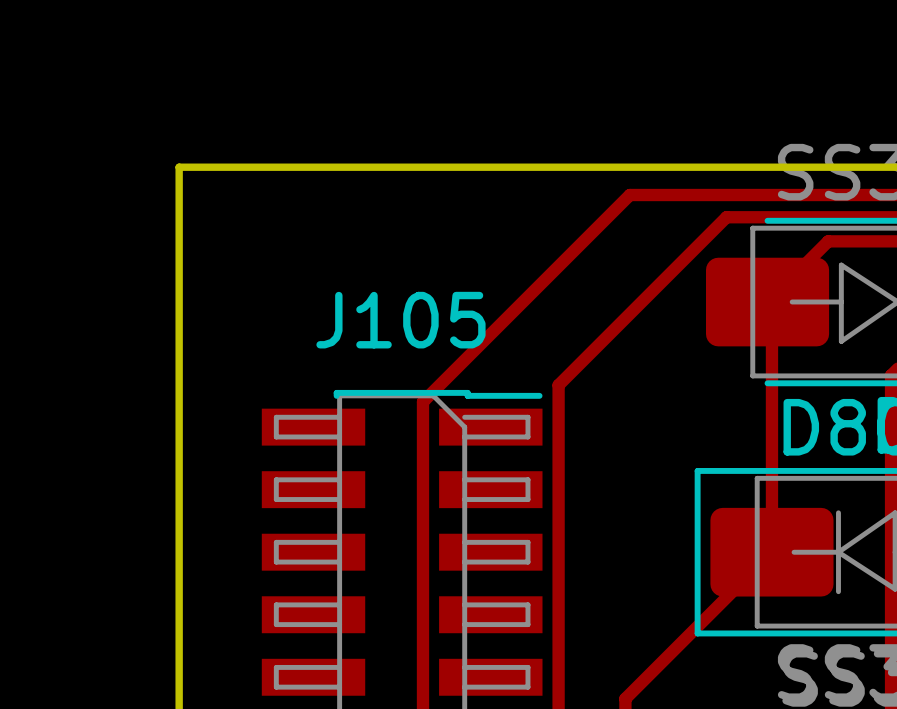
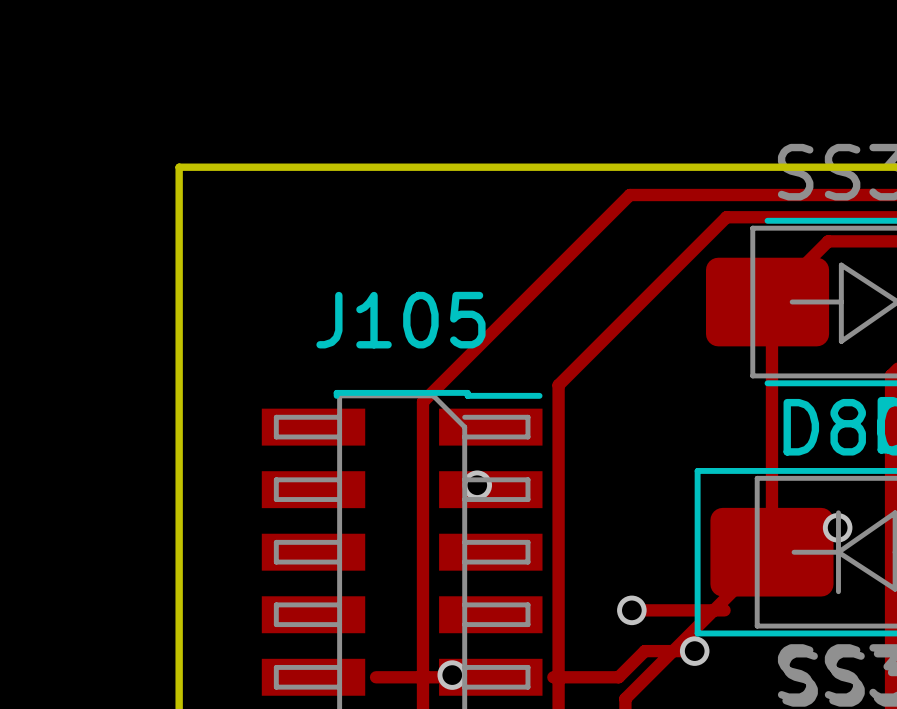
via: none -> (477, 485)
via: none -> (837, 527)
track: none -> (631, 610) (724, 610)
via: none -> (631, 610)
track: none -> (694, 651) (644, 651) (618, 677) (553, 677)
via: none -> (694, 651)
track: none -> (452, 675) (450, 677) (376, 677)
via: none -> (452, 675)

